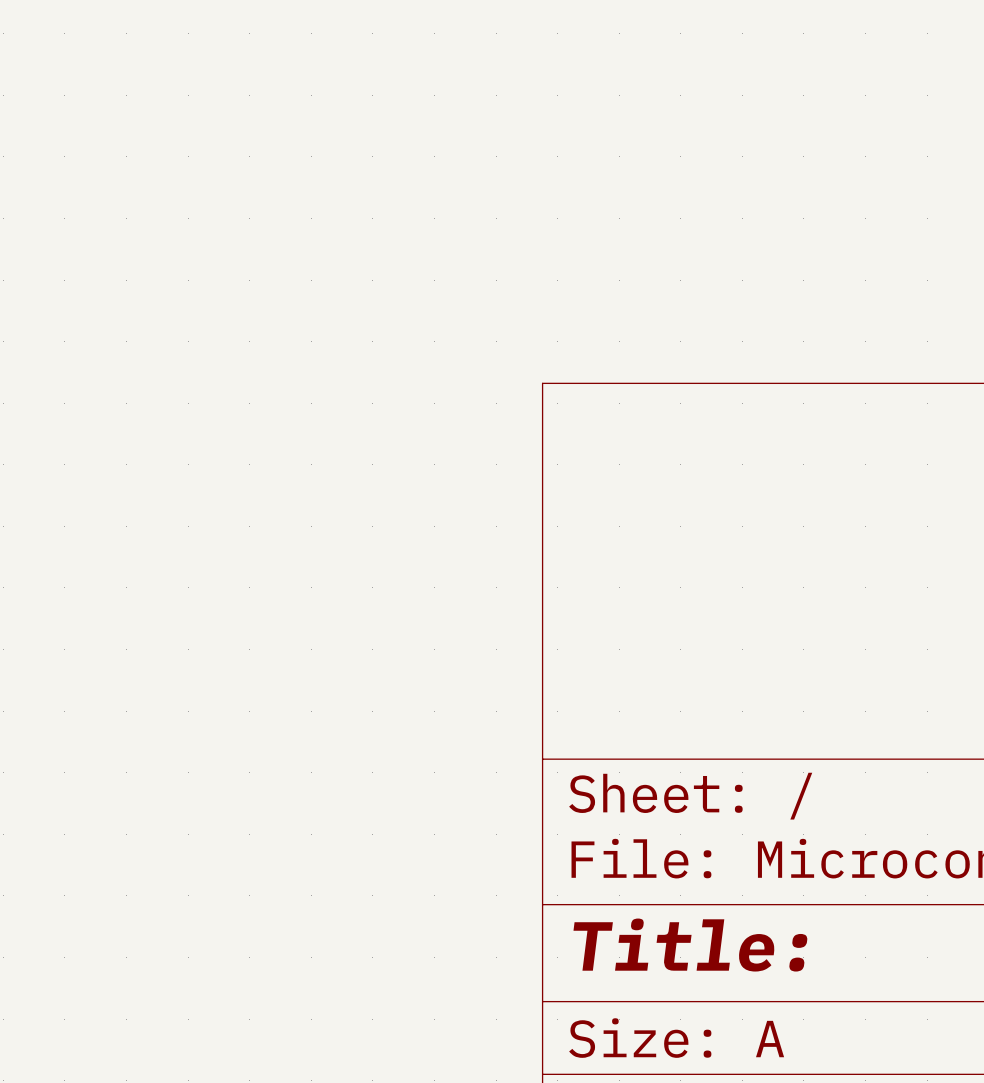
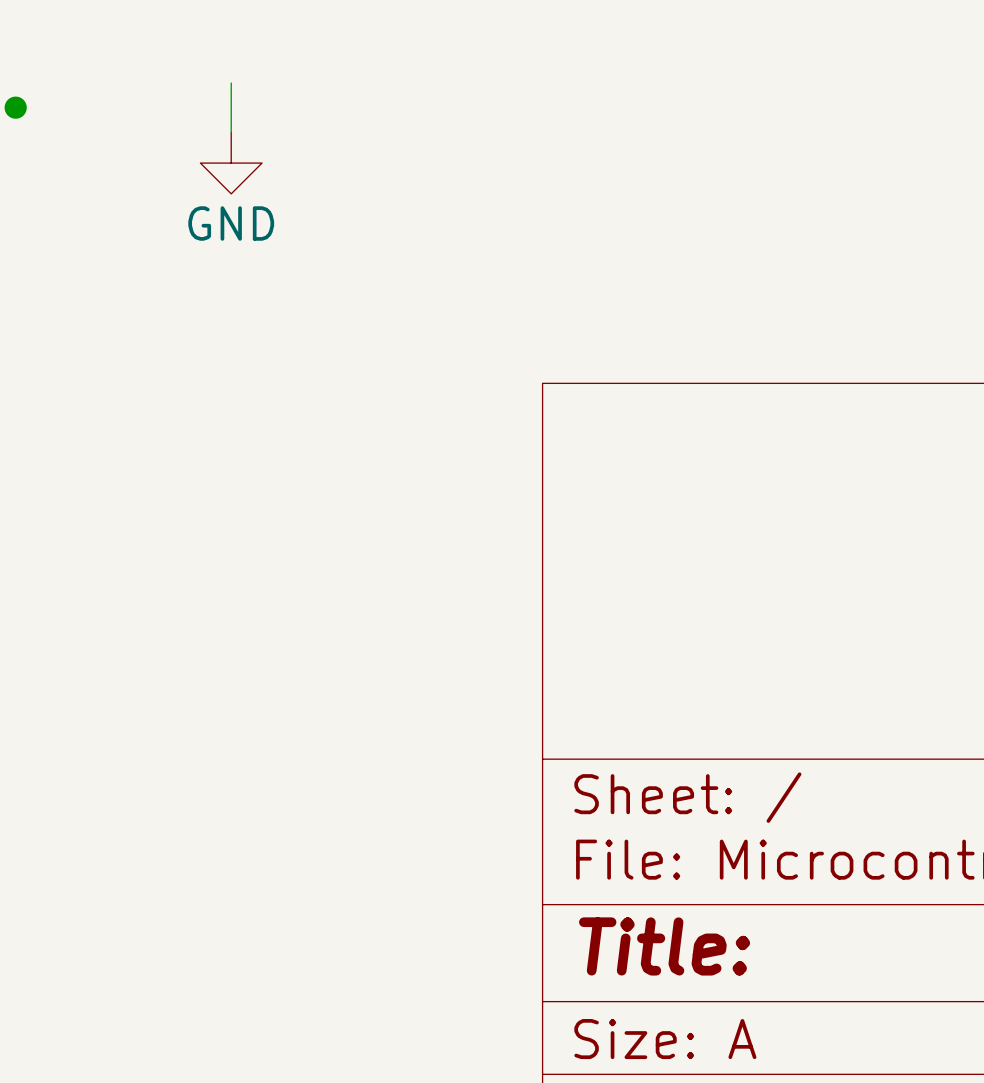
wire: none -> (231, 83) (231, 132)
junction: none -> (15, 107)
power symbol: none -> GND (231, 163)

